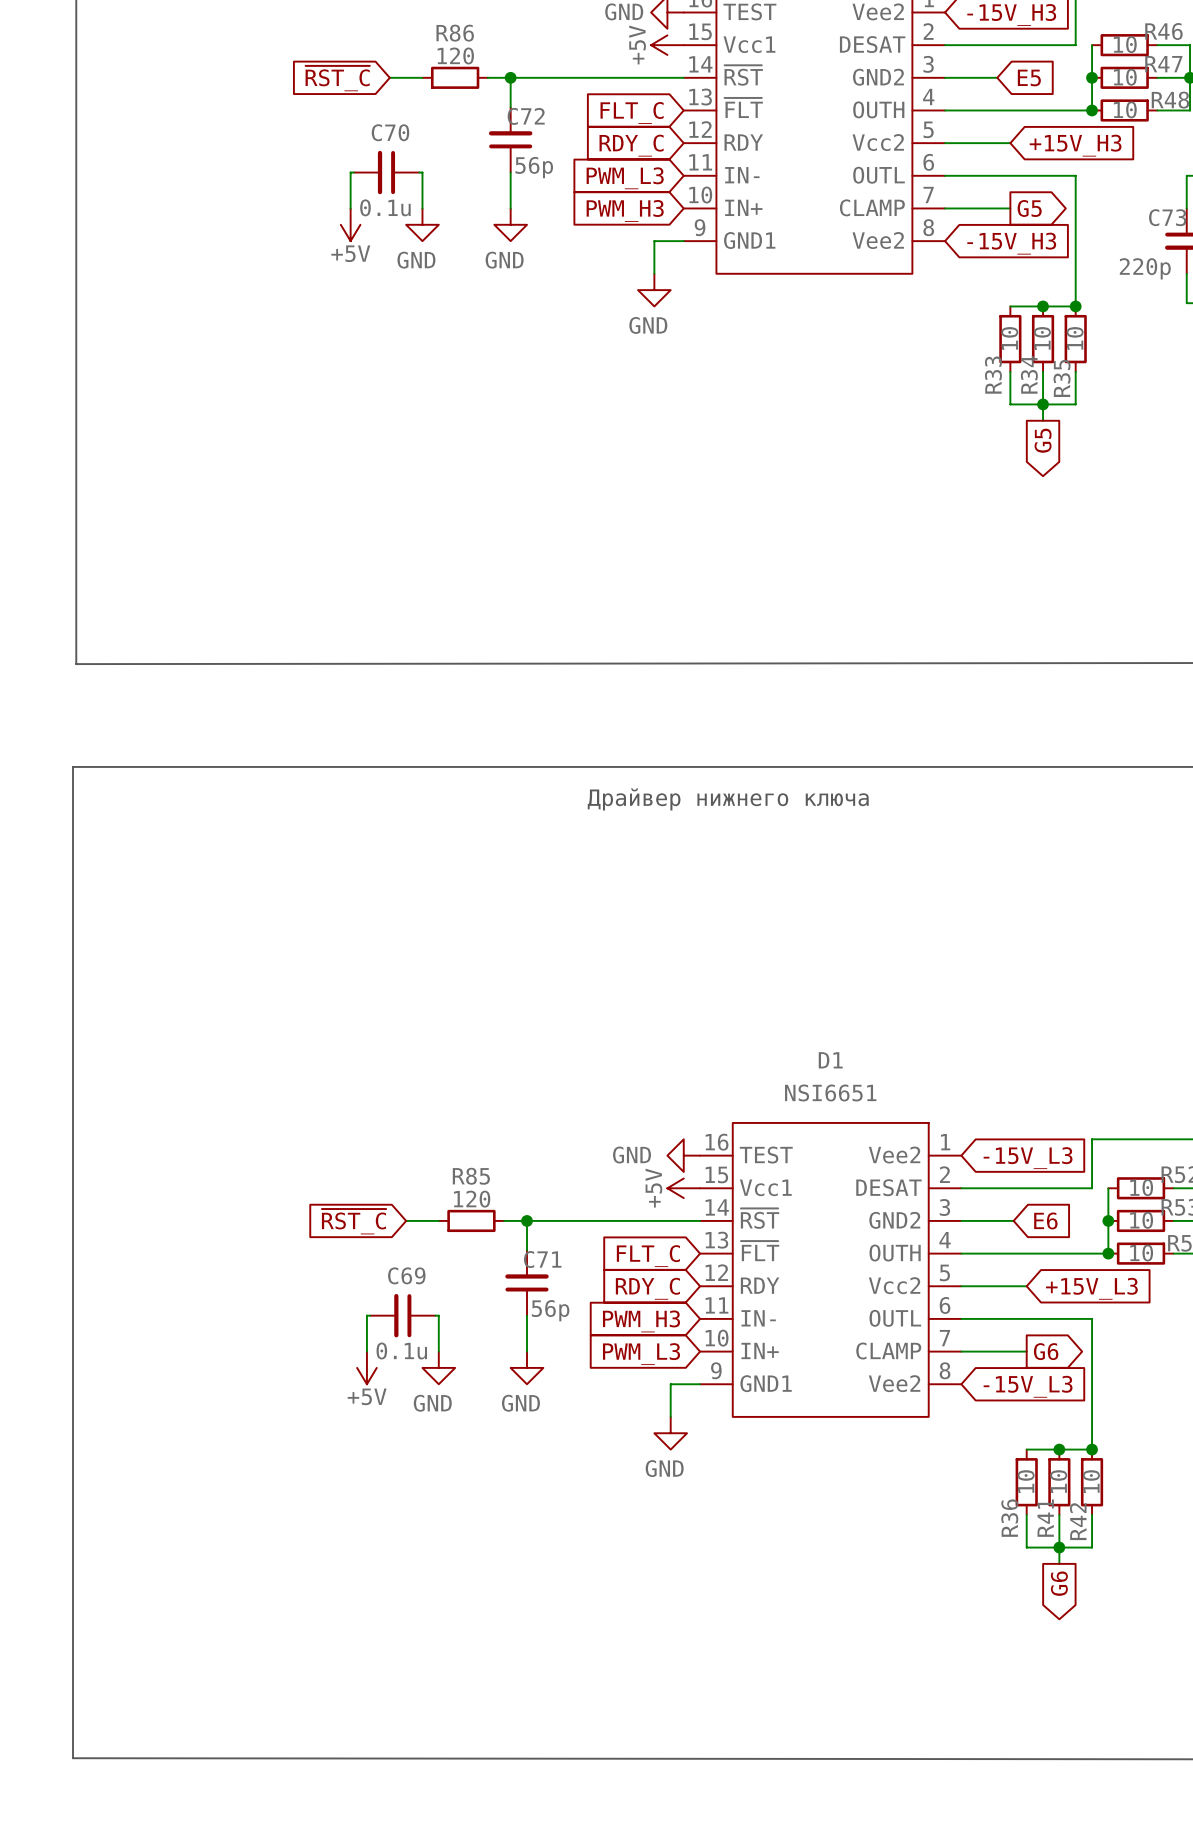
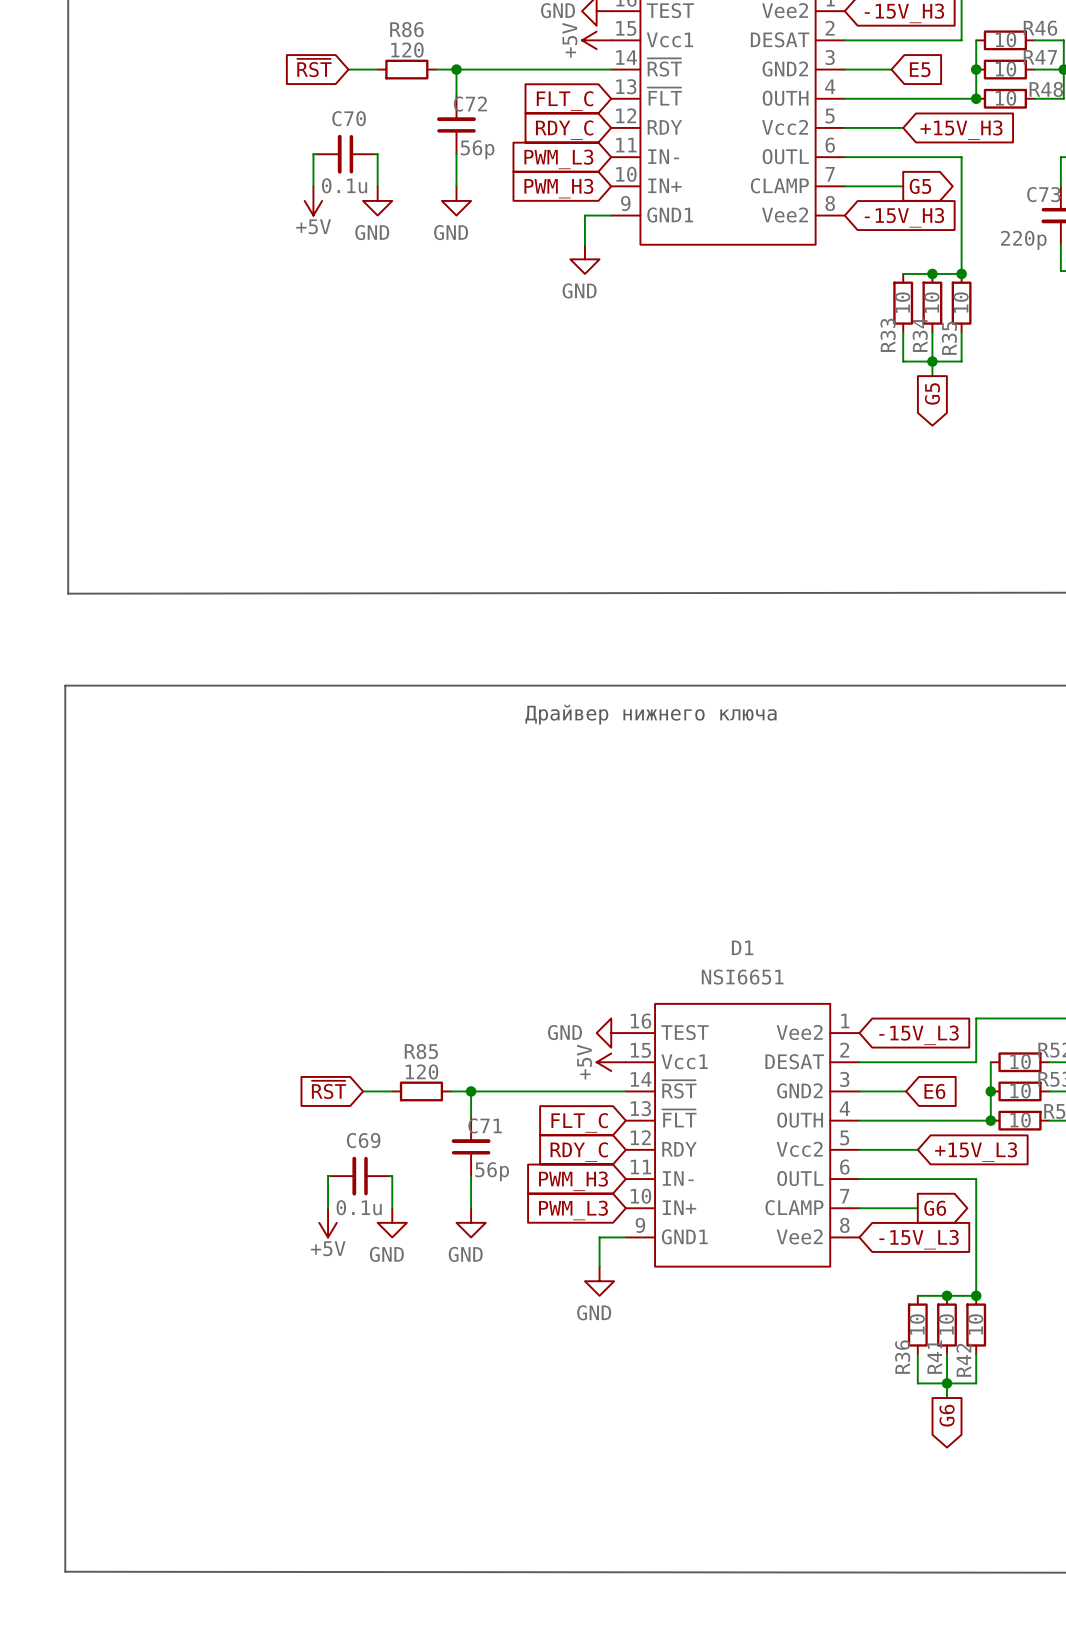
global label: ~{RST_C} (337, 78) -> ~{RST} (314, 68)
global label: ~{RST_C} (354, 1221) -> ~{RST} (329, 1089)

